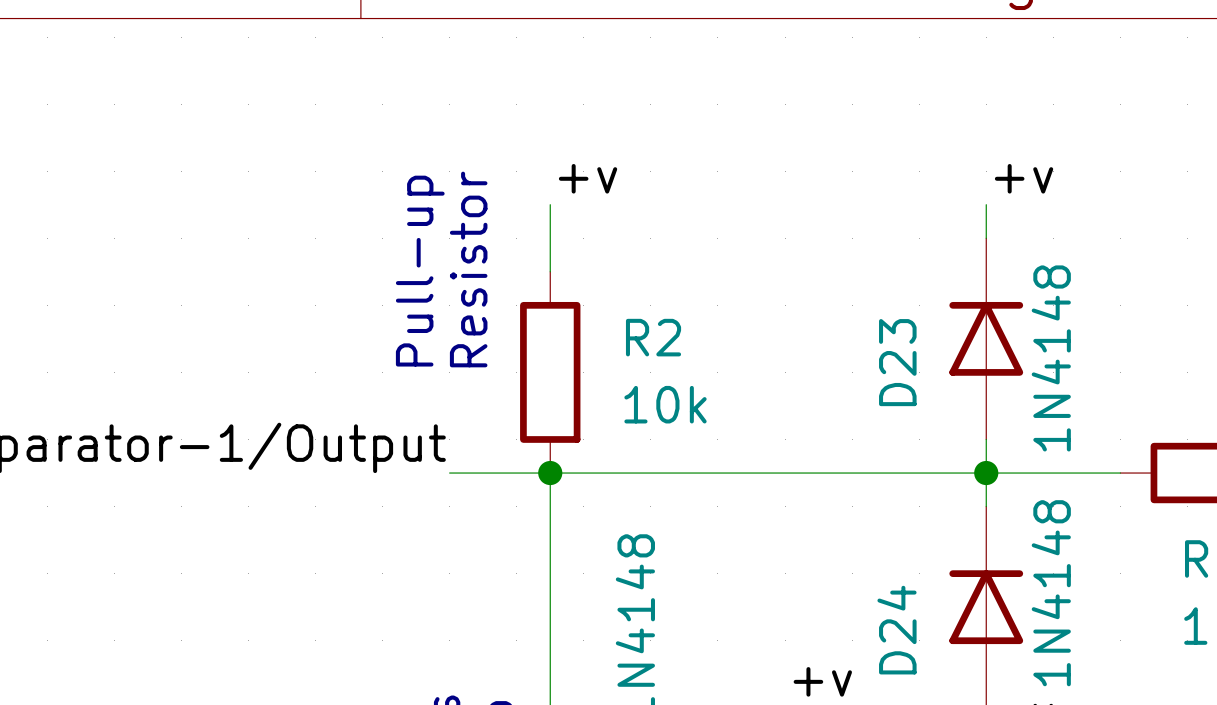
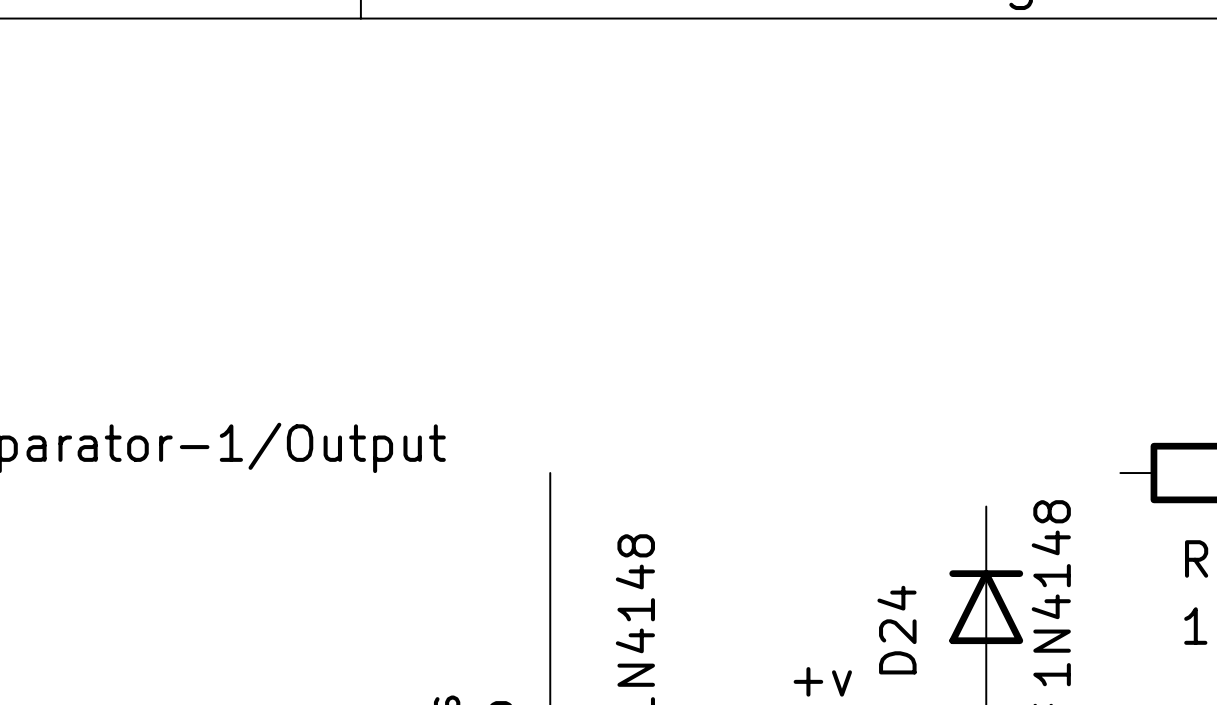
label: +v (588, 178) -> none
label: +v (1024, 178) -> none
wire: (550, 204) (550, 271) -> none
wire: (986, 204) (986, 238) -> none
text: Resistor (468, 269) -> none
text: Pull-up (420, 271) -> none
D23: 1N4148 (986, 338) -> none
R2: 10k (550, 372) -> none
wire: (986, 439) (986, 506) -> none
wire: (449, 473) (1120, 473) -> none
junction: (550, 473) -> none
junction: (986, 473) -> none

